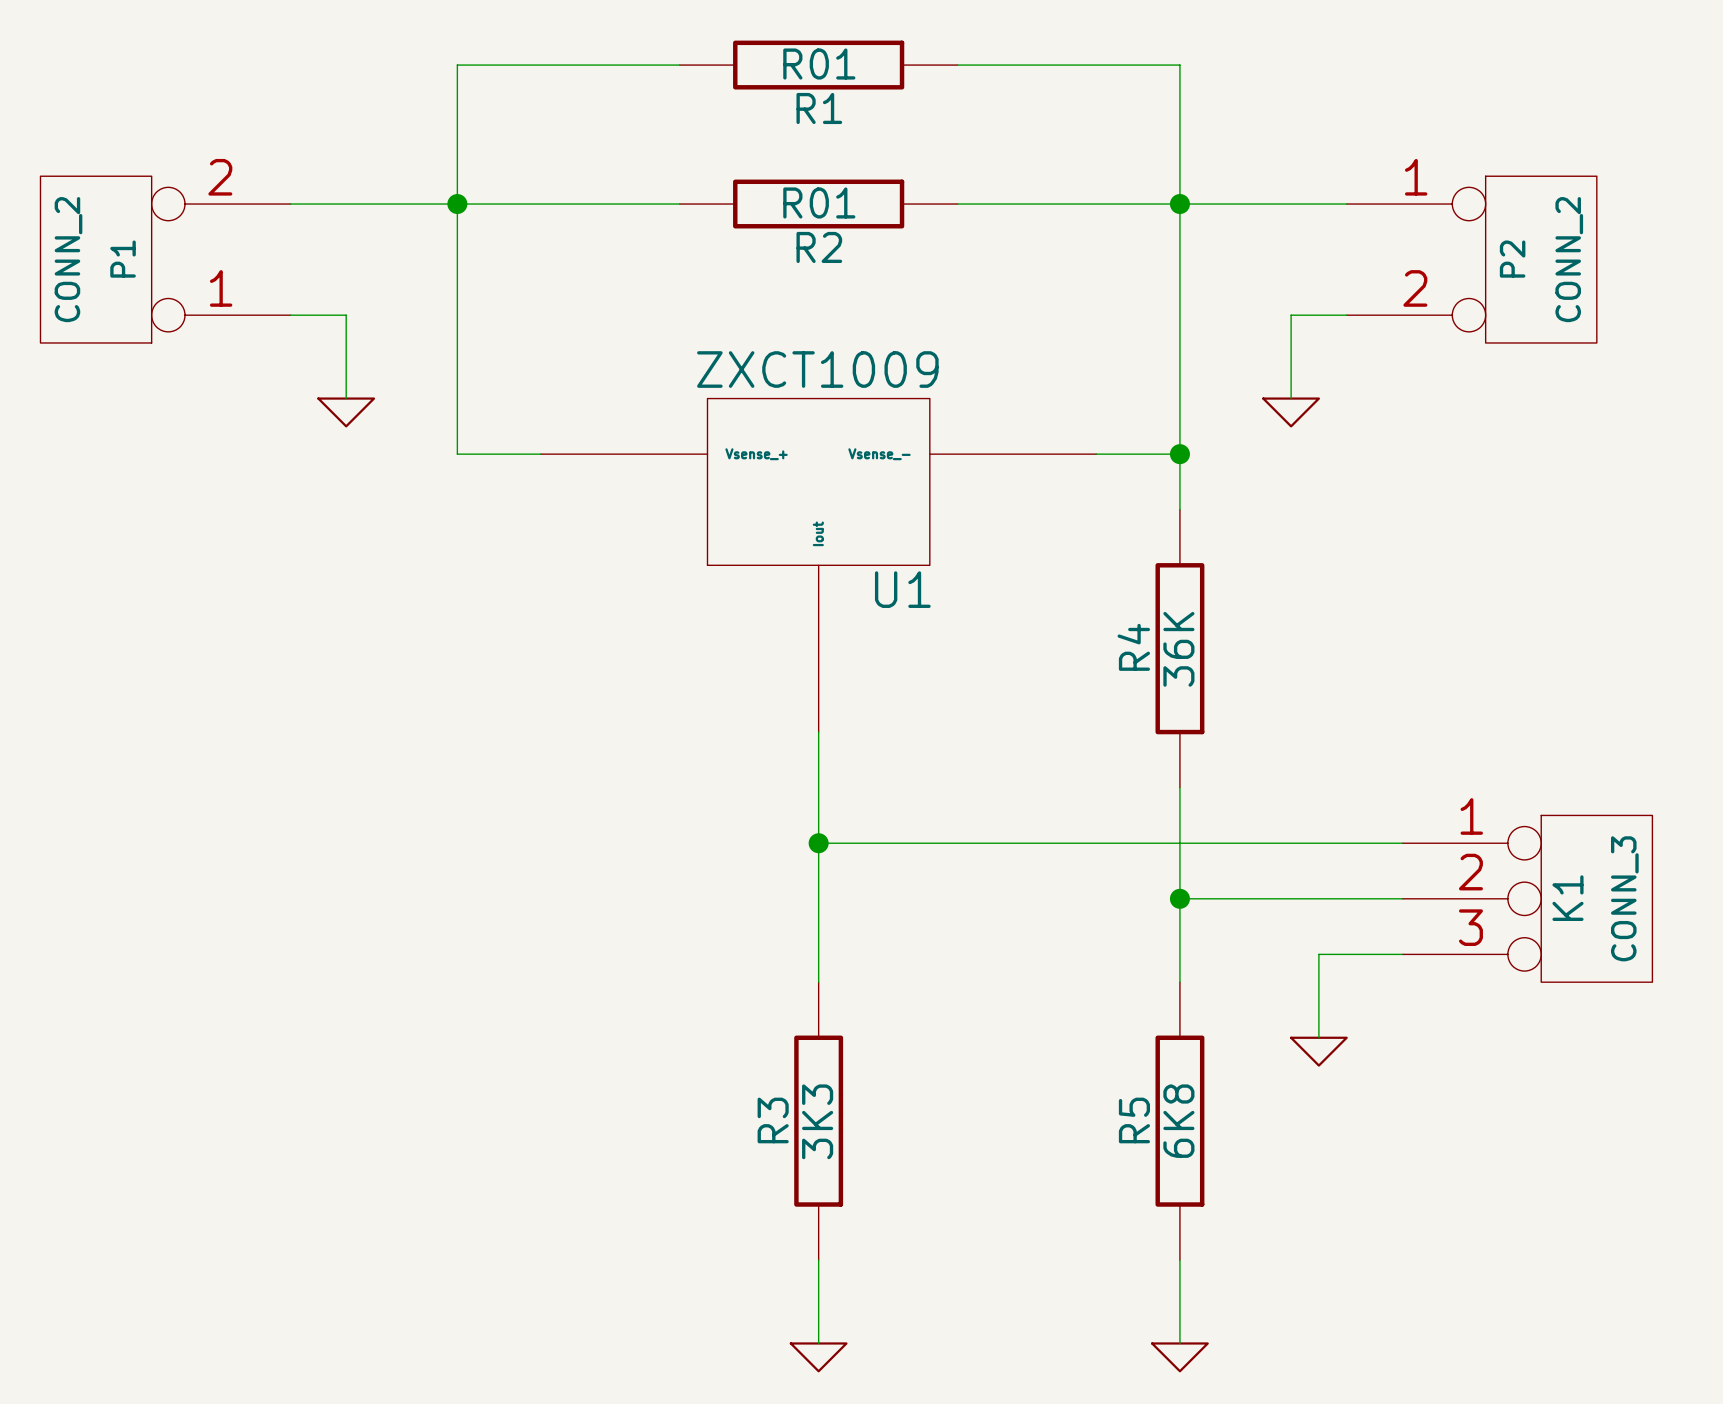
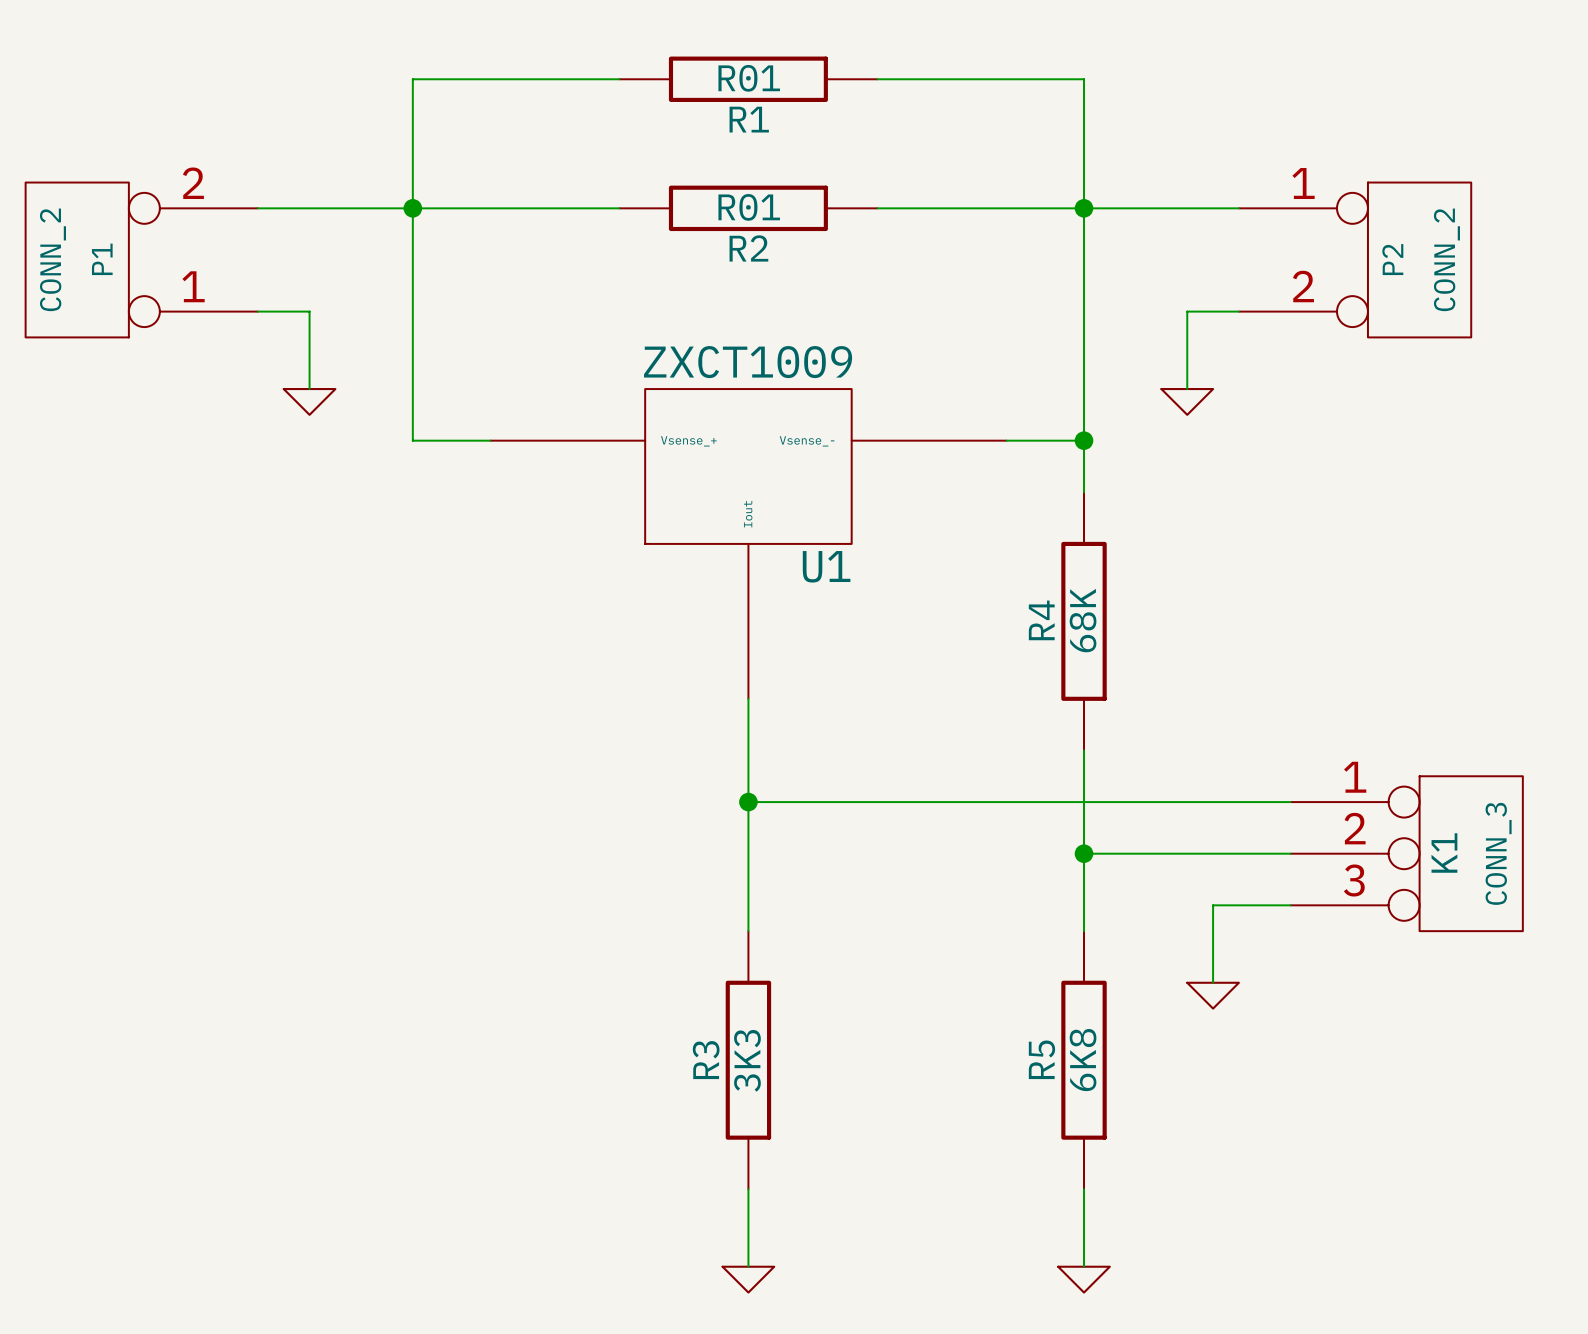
R4 value: 36K (1178, 649) -> 68K (1083, 620)

